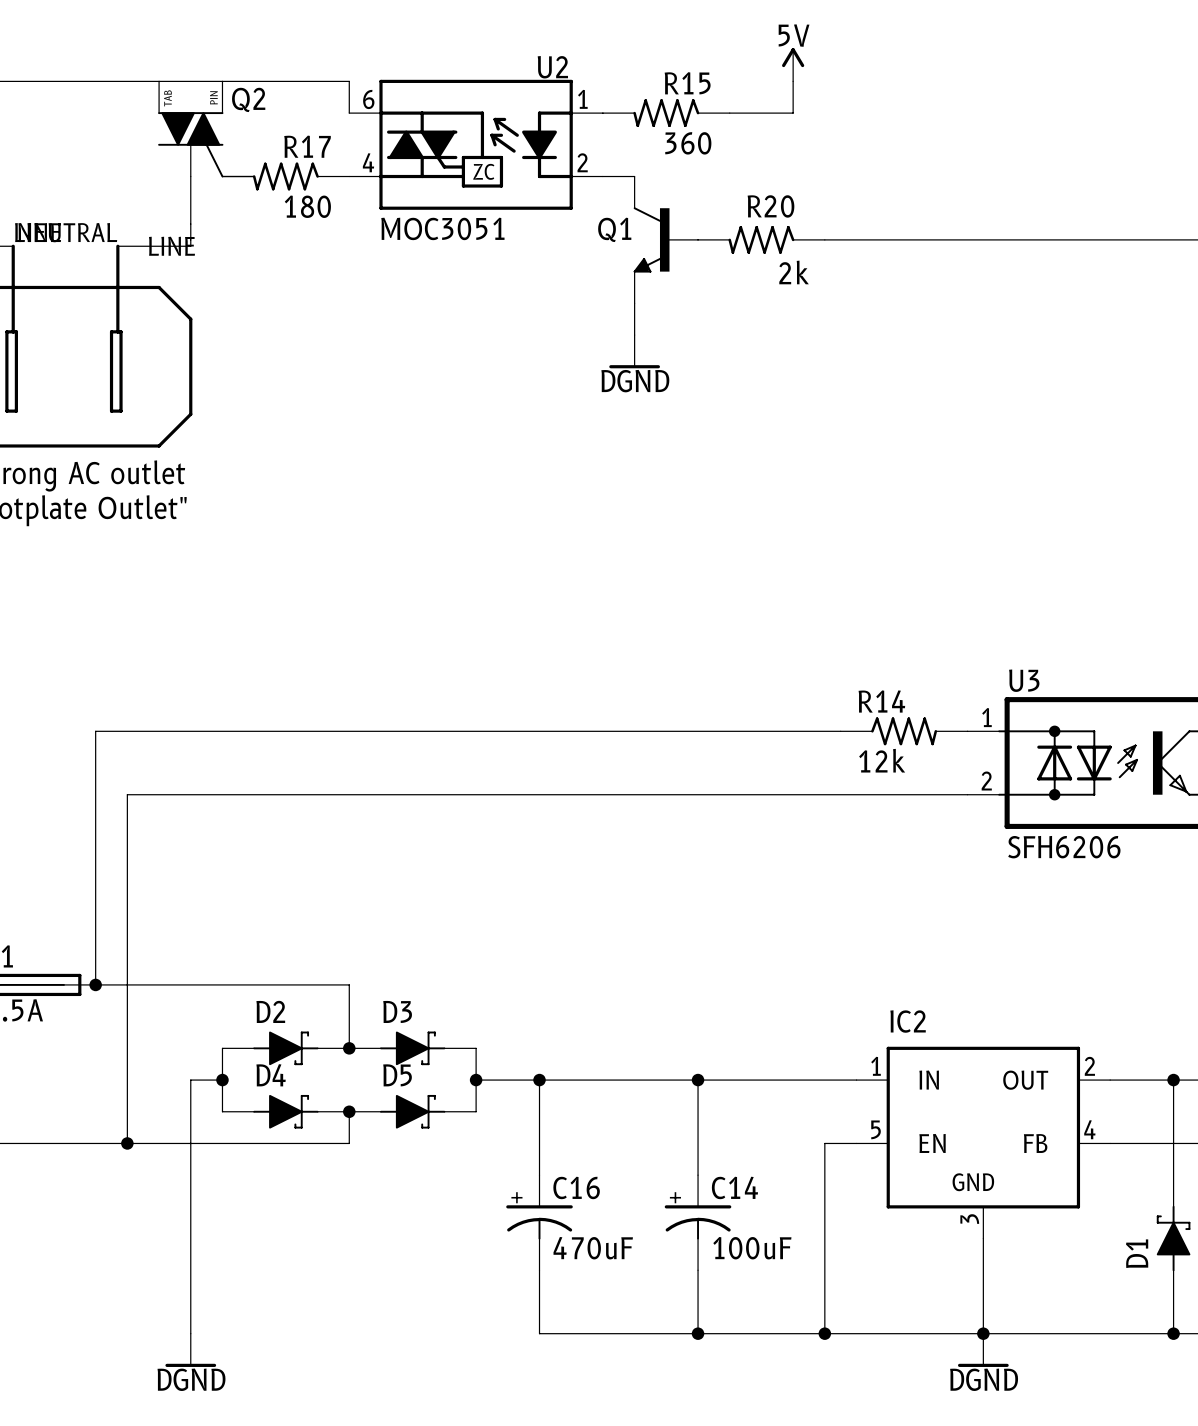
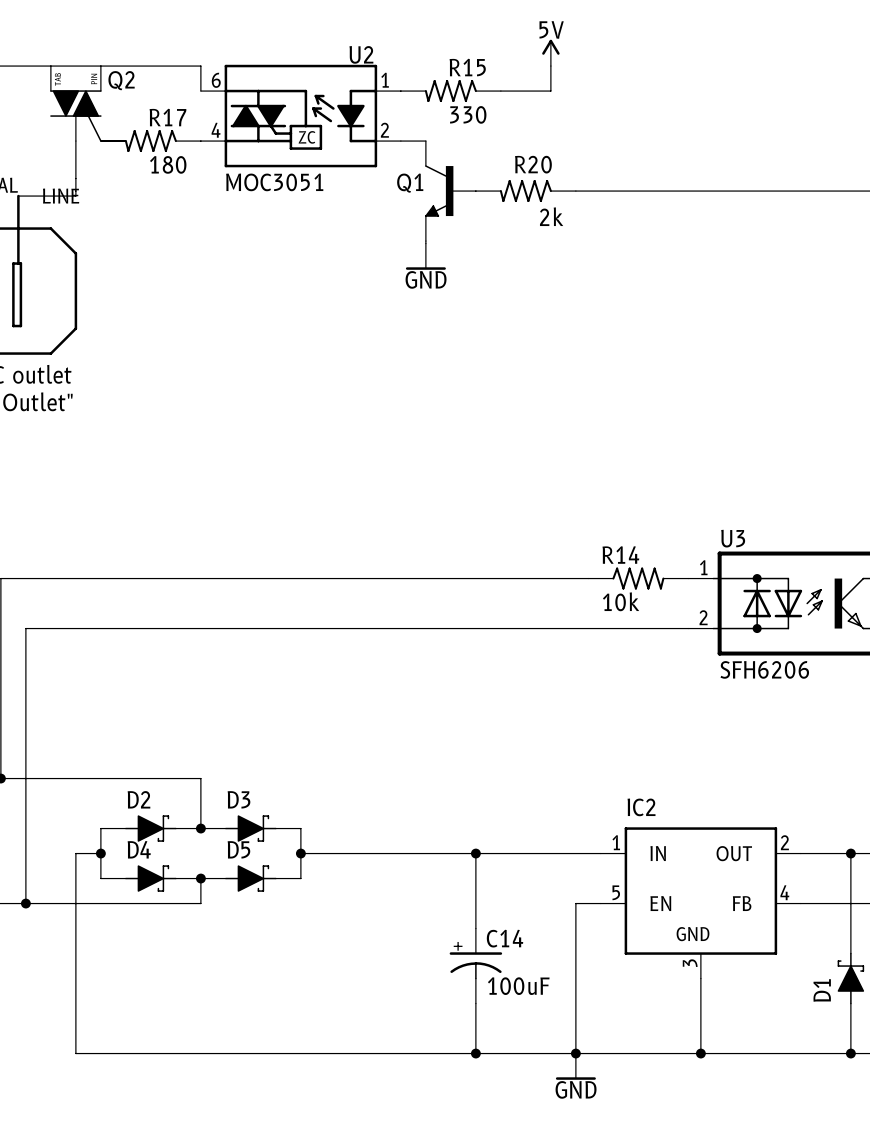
R15 value: 360 (688, 143) -> 330 (468, 114)
power symbol: none -> GND (425, 256)
power symbol: DGND (634, 351) -> none
R14 value: 12k (882, 760) -> 10k (621, 601)
wire: (539, 1080) (539, 1175) -> none
junction: (539, 1080) -> none
C16: 470uF (539, 1222) -> none
wire: (539, 1270) (539, 1333) -> (75, 1053) (350, 1053)
power symbol: DGND (190, 1350) -> none
power symbol: none -> GND (575, 1066)
power symbol: DGND (983, 1350) -> none

